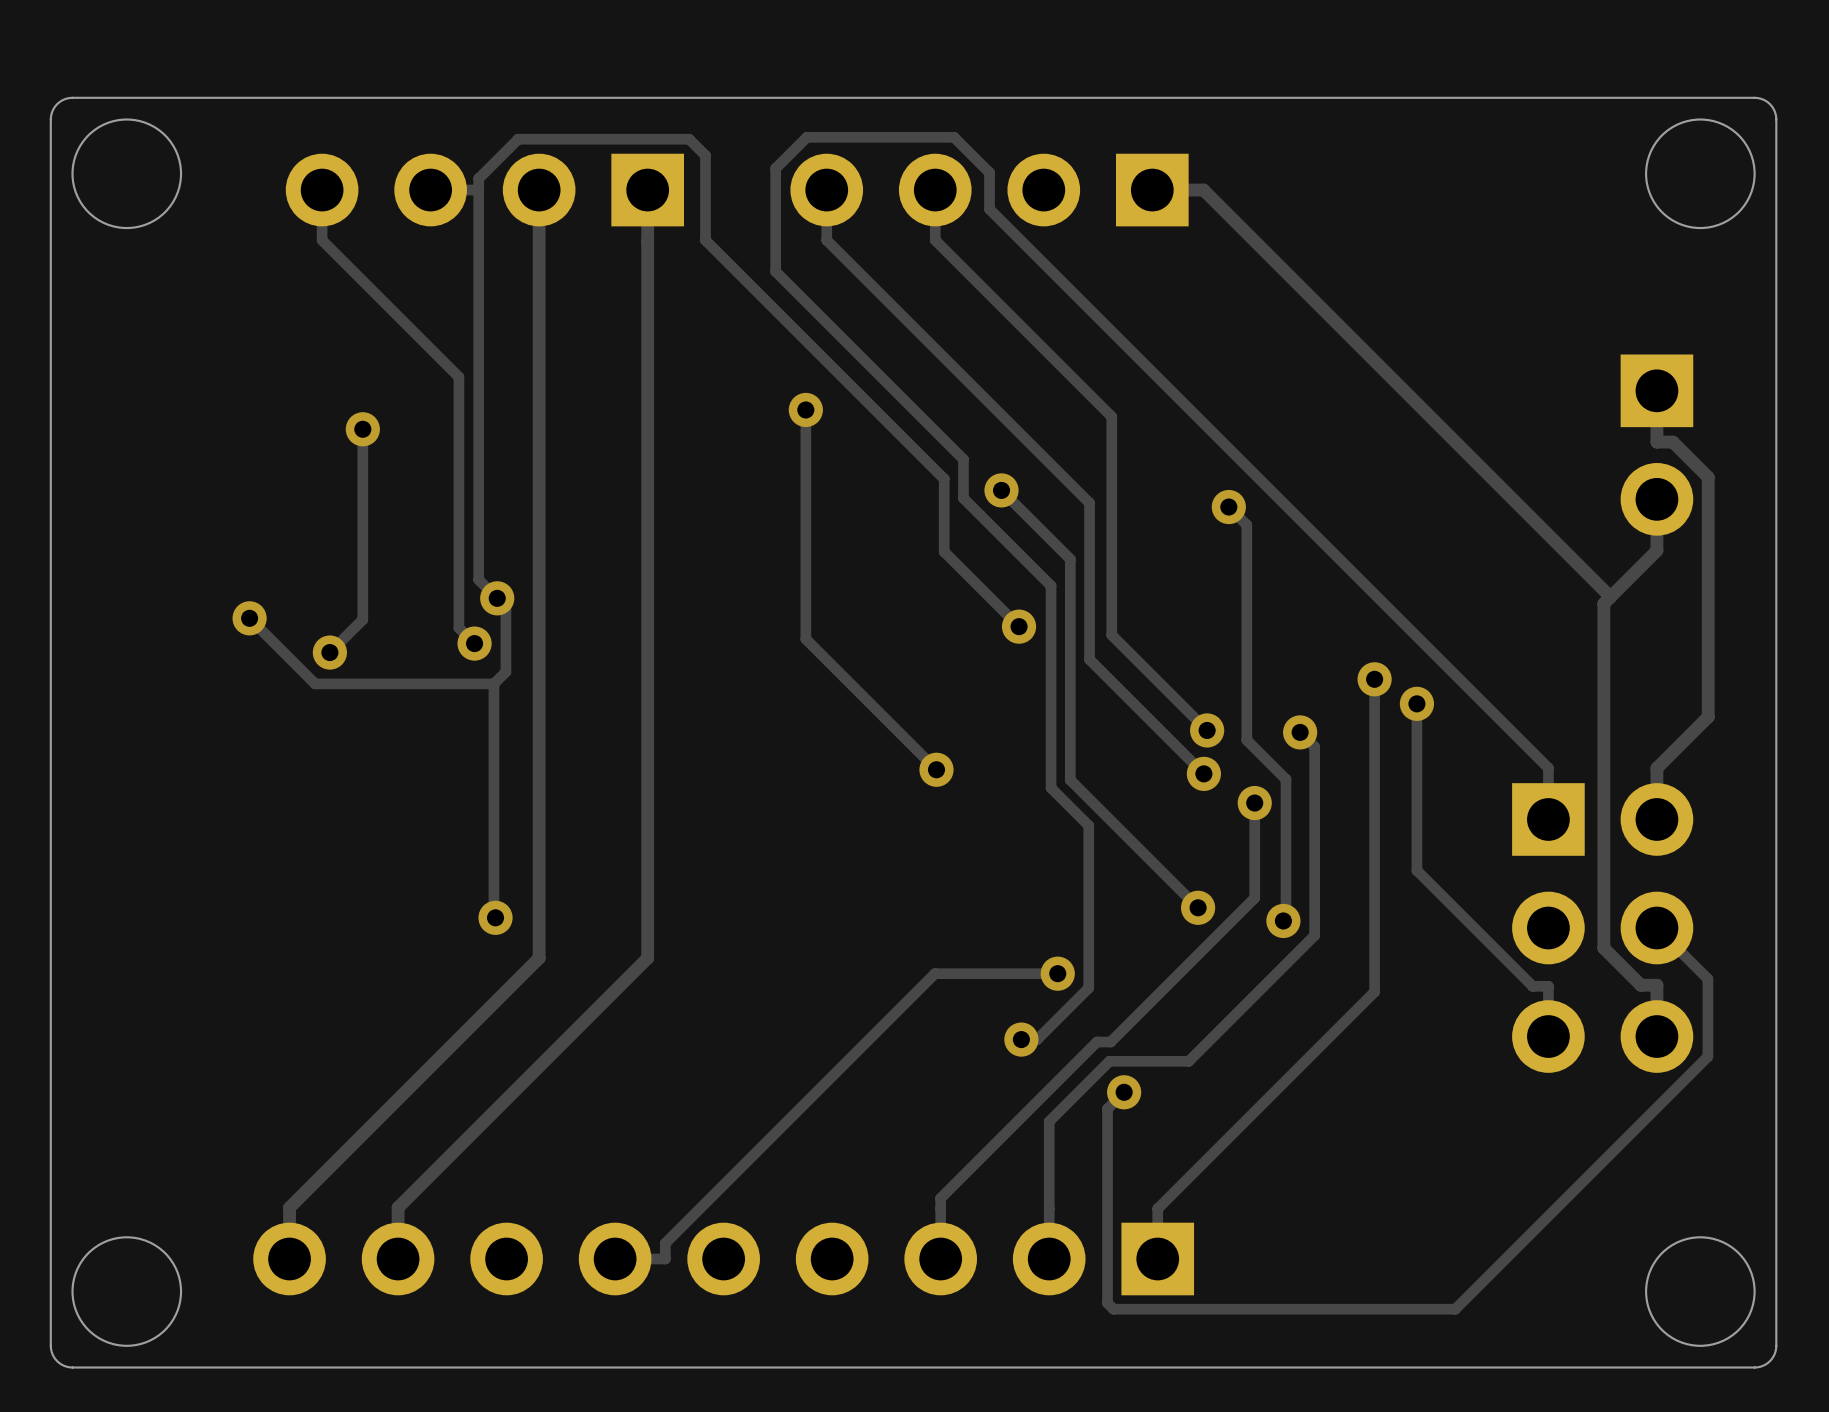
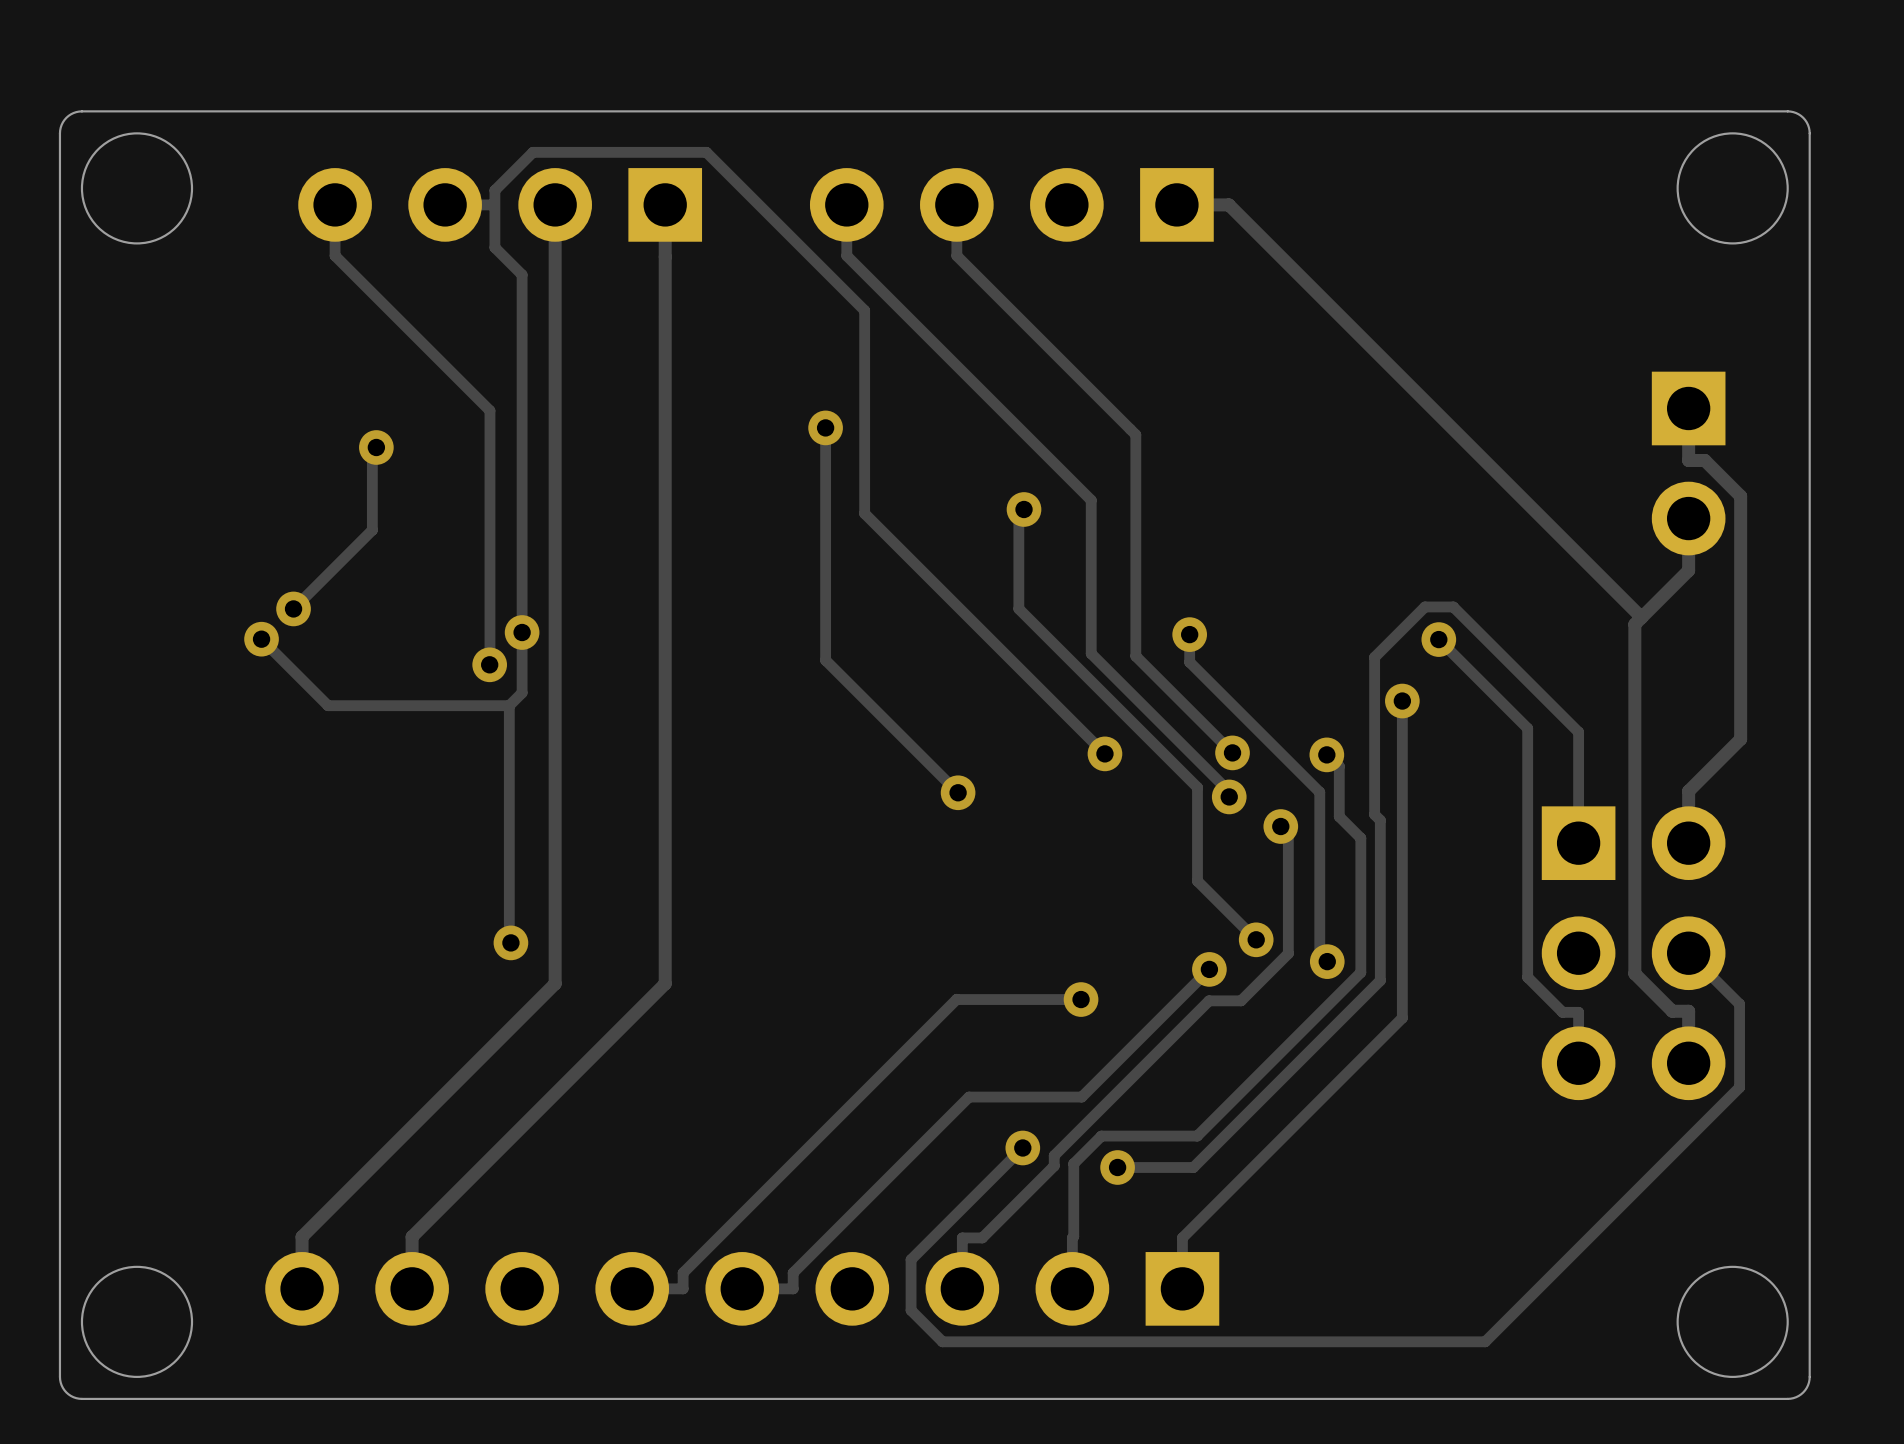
track: (689, 139) (518, 139) (478, 178) (478, 579) (505, 607) (505, 671) -> (707, 153) (532, 152) (494, 190) (494, 247) (522, 274) (521, 693)
track: (705, 155) (705, 240) (944, 478) (944, 551) (1019, 626) -> (723, 169) (864, 310) (864, 513) (1104, 753)
track: (458, 377) (458, 627) (474, 643) -> (473, 394) (489, 410) (489, 665)
track: (362, 429) (362, 619) (329, 652) -> none
track: none -> (372, 451) (372, 530) (293, 608)
track: (1067, 481) (1089, 503) (1089, 659) (1203, 773) -> (1091, 500) (1091, 653) (1235, 797)
track: none -> (1018, 509) (1018, 608) (1197, 787) (1197, 881) (1256, 939)
track: (1001, 490) (1070, 559) (1070, 780) (1198, 907) -> none
track: (1228, 507) (1246, 525) (1246, 740) (1286, 779) (1286, 918) (1283, 920) -> none
via: (1228, 507) -> none
via position: (497, 598) -> (522, 632)
track: none -> (1189, 634) (1189, 662) (1319, 792) (1319, 954) (1327, 961)
via: none -> (1189, 634)
via: (1019, 626) -> none
via position: (329, 652) -> (293, 608)
track: (1416, 703) (1416, 870) (1498, 951) -> (1438, 639) (1527, 728) (1527, 977)
via position: (1416, 703) -> (1438, 639)
via: none -> (1104, 753)
track: (1300, 732) (1314, 746) (1314, 935) (1188, 1061) (1109, 1061) (1049, 1121) (1049, 1208) -> (1327, 754) (1339, 766) (1339, 816) (1360, 838) (1360, 972) (1197, 1136) (1101, 1136) (1073, 1163) (1072, 1237)
track: (1548, 768) (989, 209) (989, 172) (954, 137) (806, 137) (775, 168) (775, 271) (963, 459) (963, 498) (1051, 585) (1051, 787) (1088, 825) (1088, 988) (1037, 1039) (1021, 1039) -> (1578, 791) (1578, 732) (1453, 606) (1424, 606) (1374, 657) (1374, 814) (1380, 820) (1380, 980) (1193, 1167) (1117, 1167)
track: (1254, 803) (1254, 898) (1110, 1042) (1096, 1042) (940, 1198) (940, 1208) -> (1288, 822) (1288, 953) (1241, 1000) (1209, 1000) (1054, 1155) (1054, 1165) (982, 1237) (962, 1237)
via position: (1198, 907) -> (1256, 939)
via position: (1283, 920) -> (1327, 961)
track: none -> (1209, 969) (1081, 1097) (969, 1097) (793, 1272) (793, 1288) (742, 1288)
via: none -> (1209, 969)
track: (1707, 978) (1707, 1056) (1455, 1309) (1113, 1309) (1107, 1303) (1107, 1108) (1124, 1092) -> (1739, 1004) (1739, 1087) (1485, 1341) (942, 1341) (911, 1310) (911, 1259) (1022, 1147)
via: (1021, 1039) -> none
via position: (1124, 1092) -> (1117, 1167)
via: none -> (1022, 1147)

